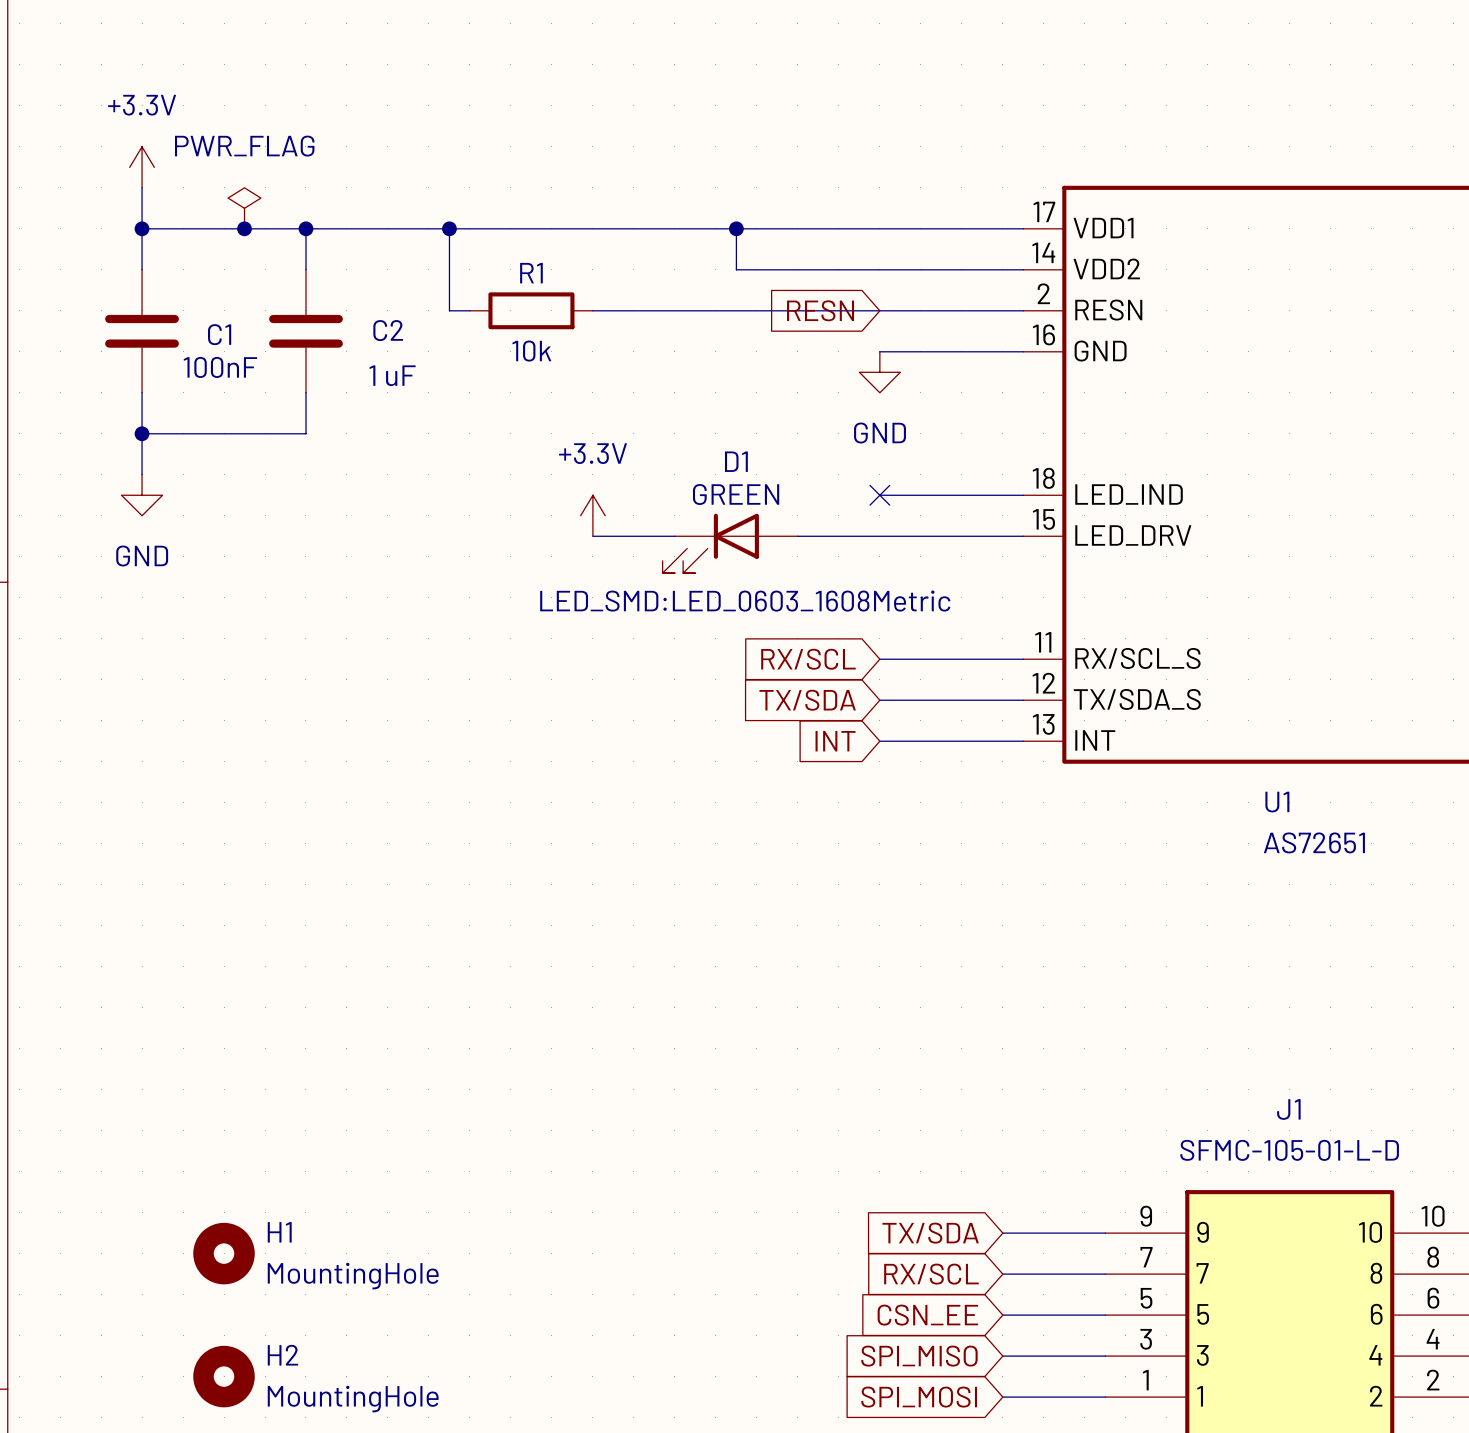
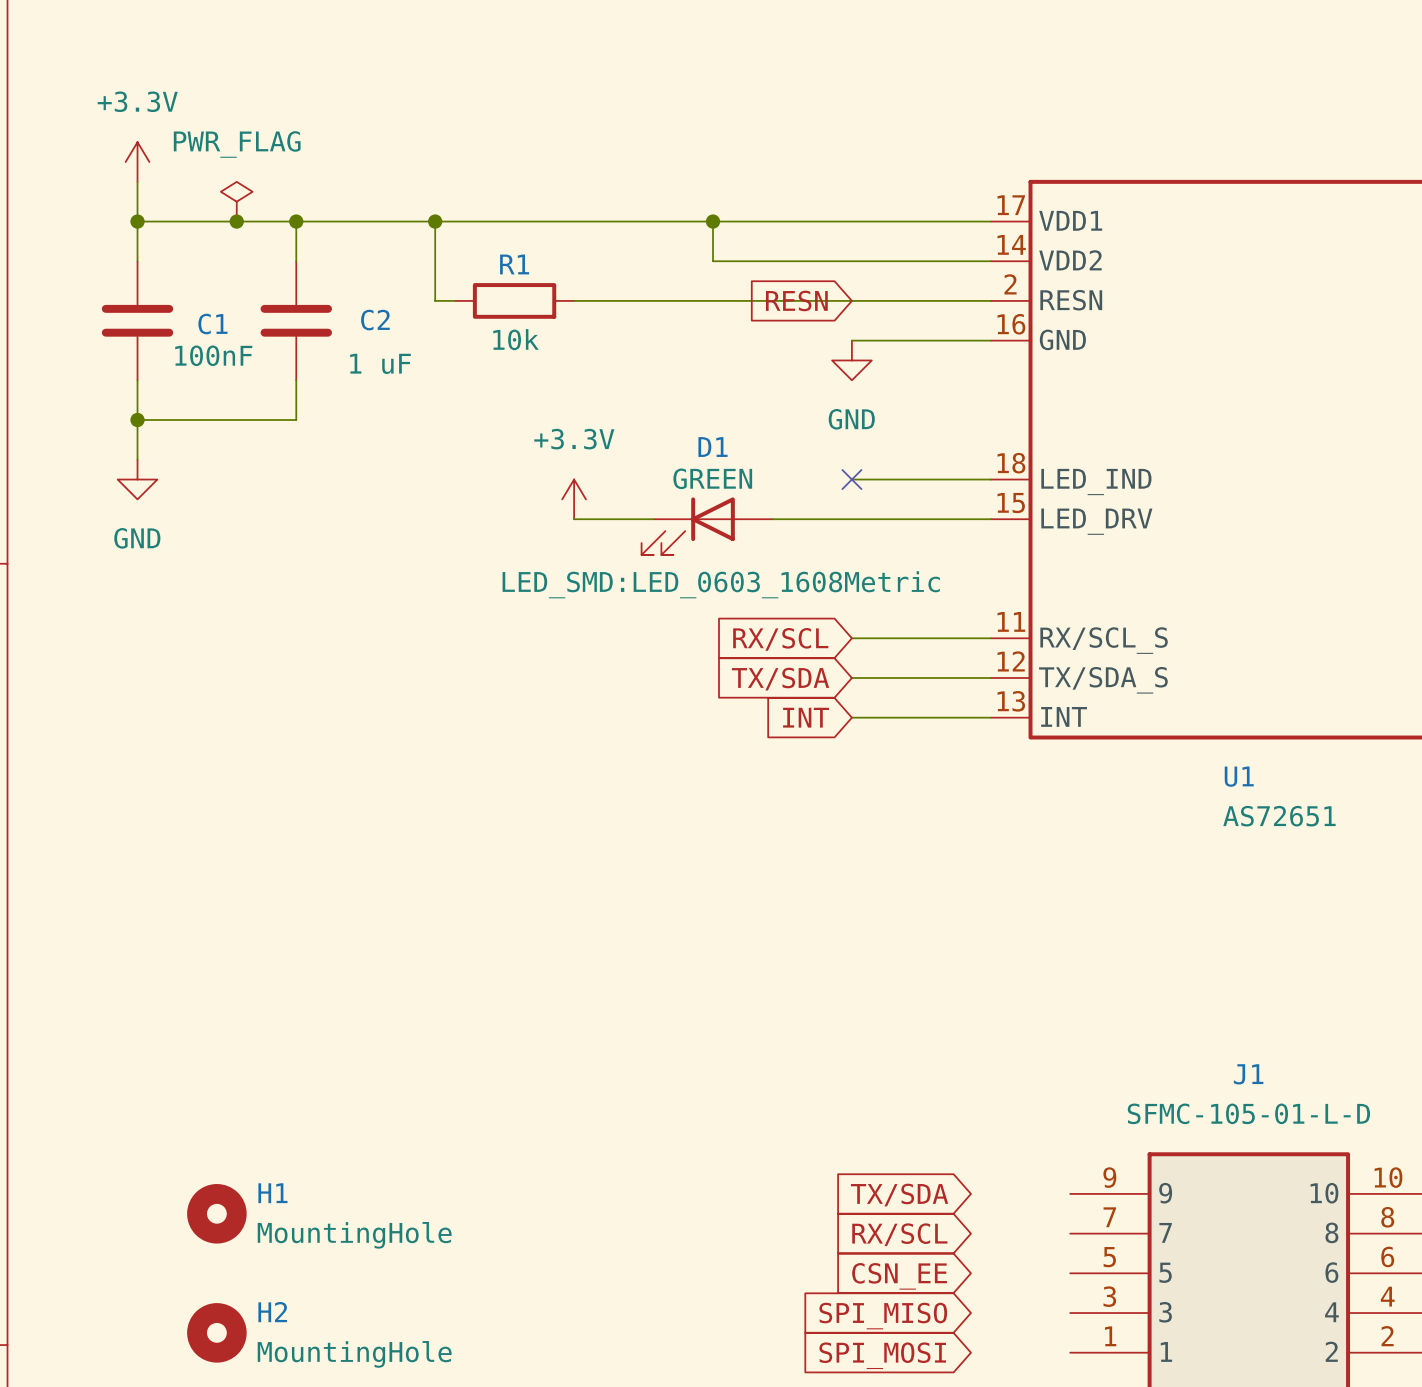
wire: (1002, 1233) (1105, 1233) -> none
wire: (1002, 1274) (1105, 1274) -> none
wire: (1002, 1315) (1105, 1315) -> none
wire: (1002, 1356) (1105, 1356) -> none
wire: (1002, 1397) (1105, 1397) -> none

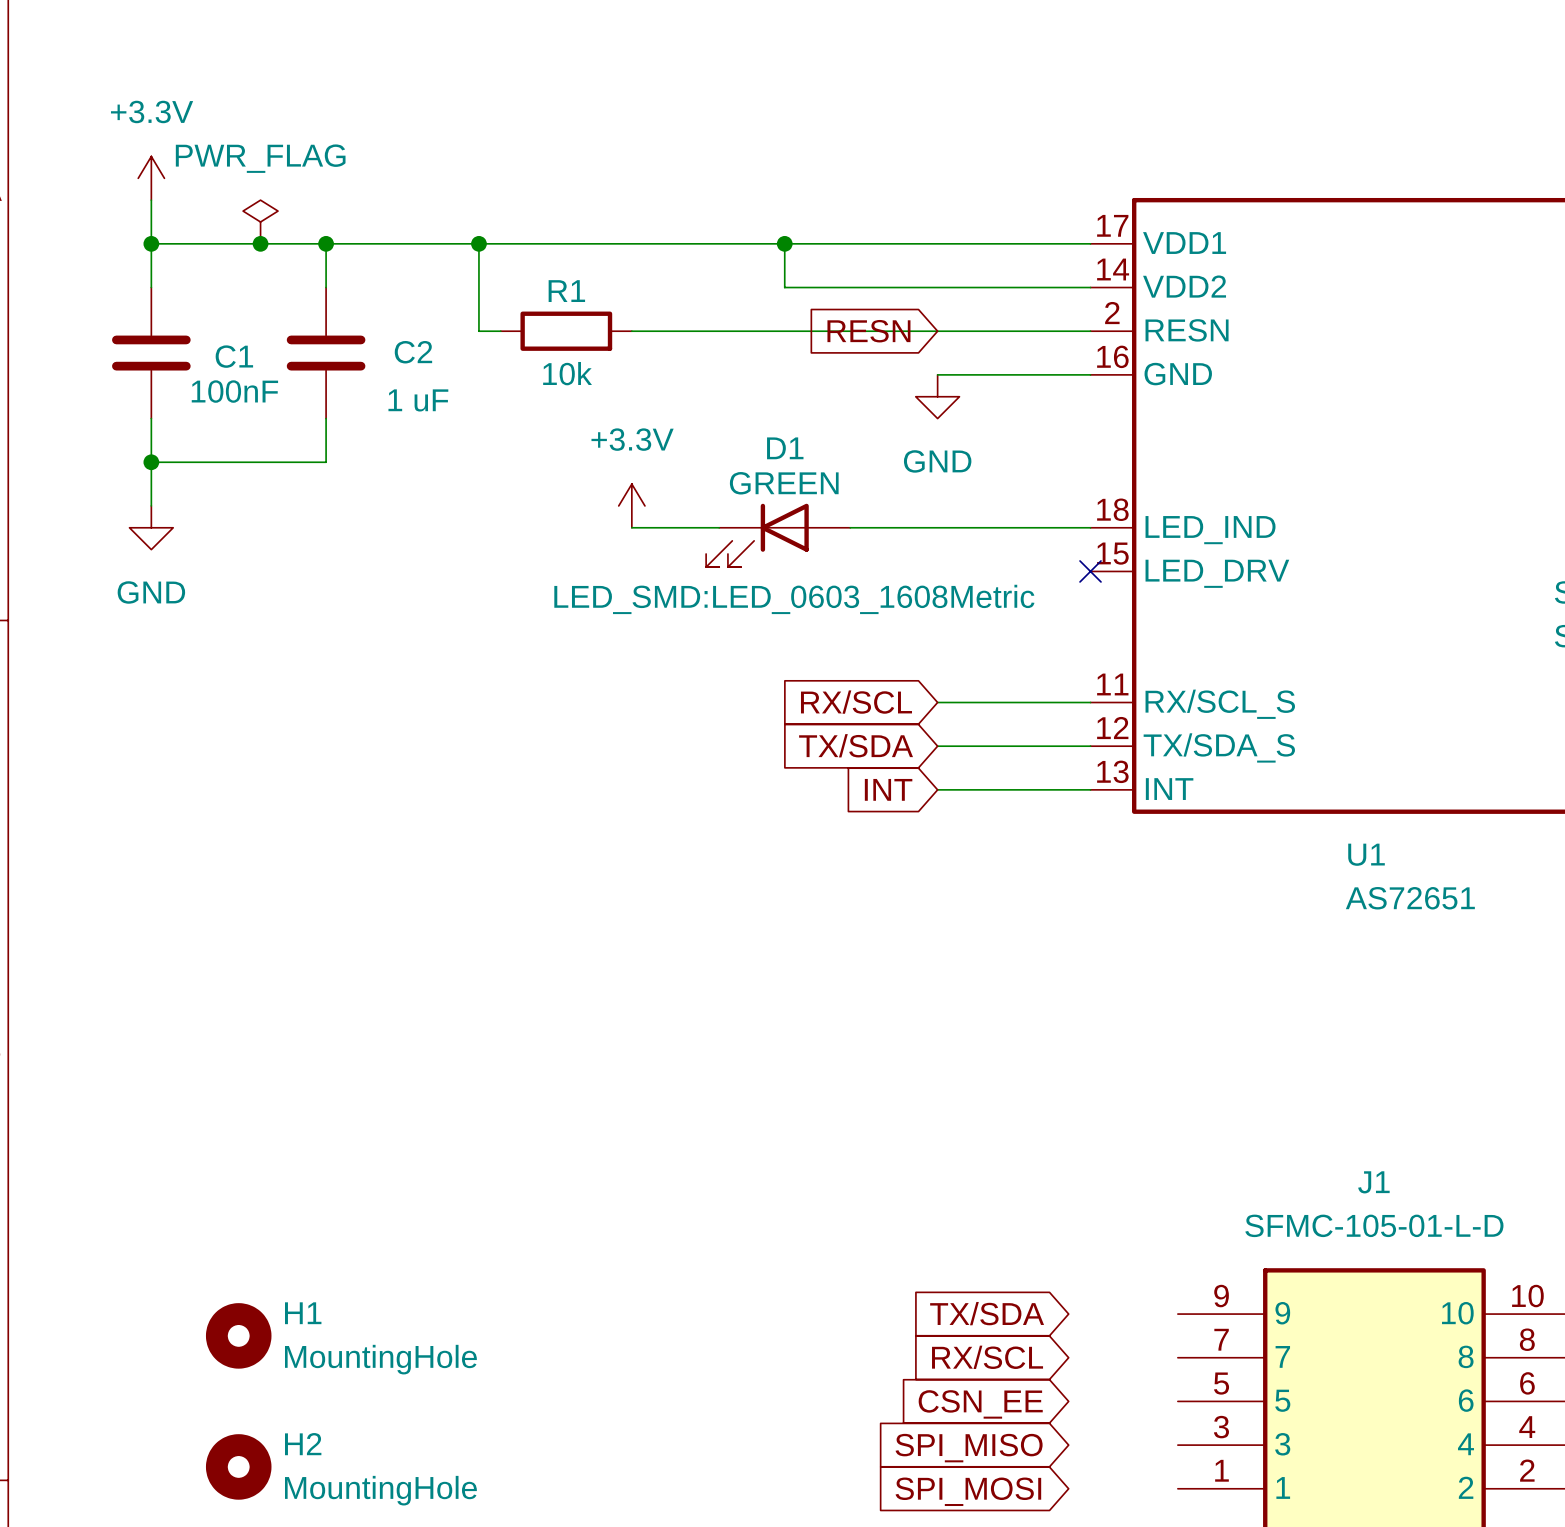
wire: none -> (850, 527) (937, 527)
no-connect mark: (851, 479) -> none
power symbol position: +3.3V (574, 499) -> +3.3V (631, 505)
wire: (574, 519) (653, 519) -> (631, 527) (719, 527)
wire: (772, 519) (990, 519) -> none
no-connect mark: none -> (1090, 571)
D1 position: (707, 526) -> (778, 535)

